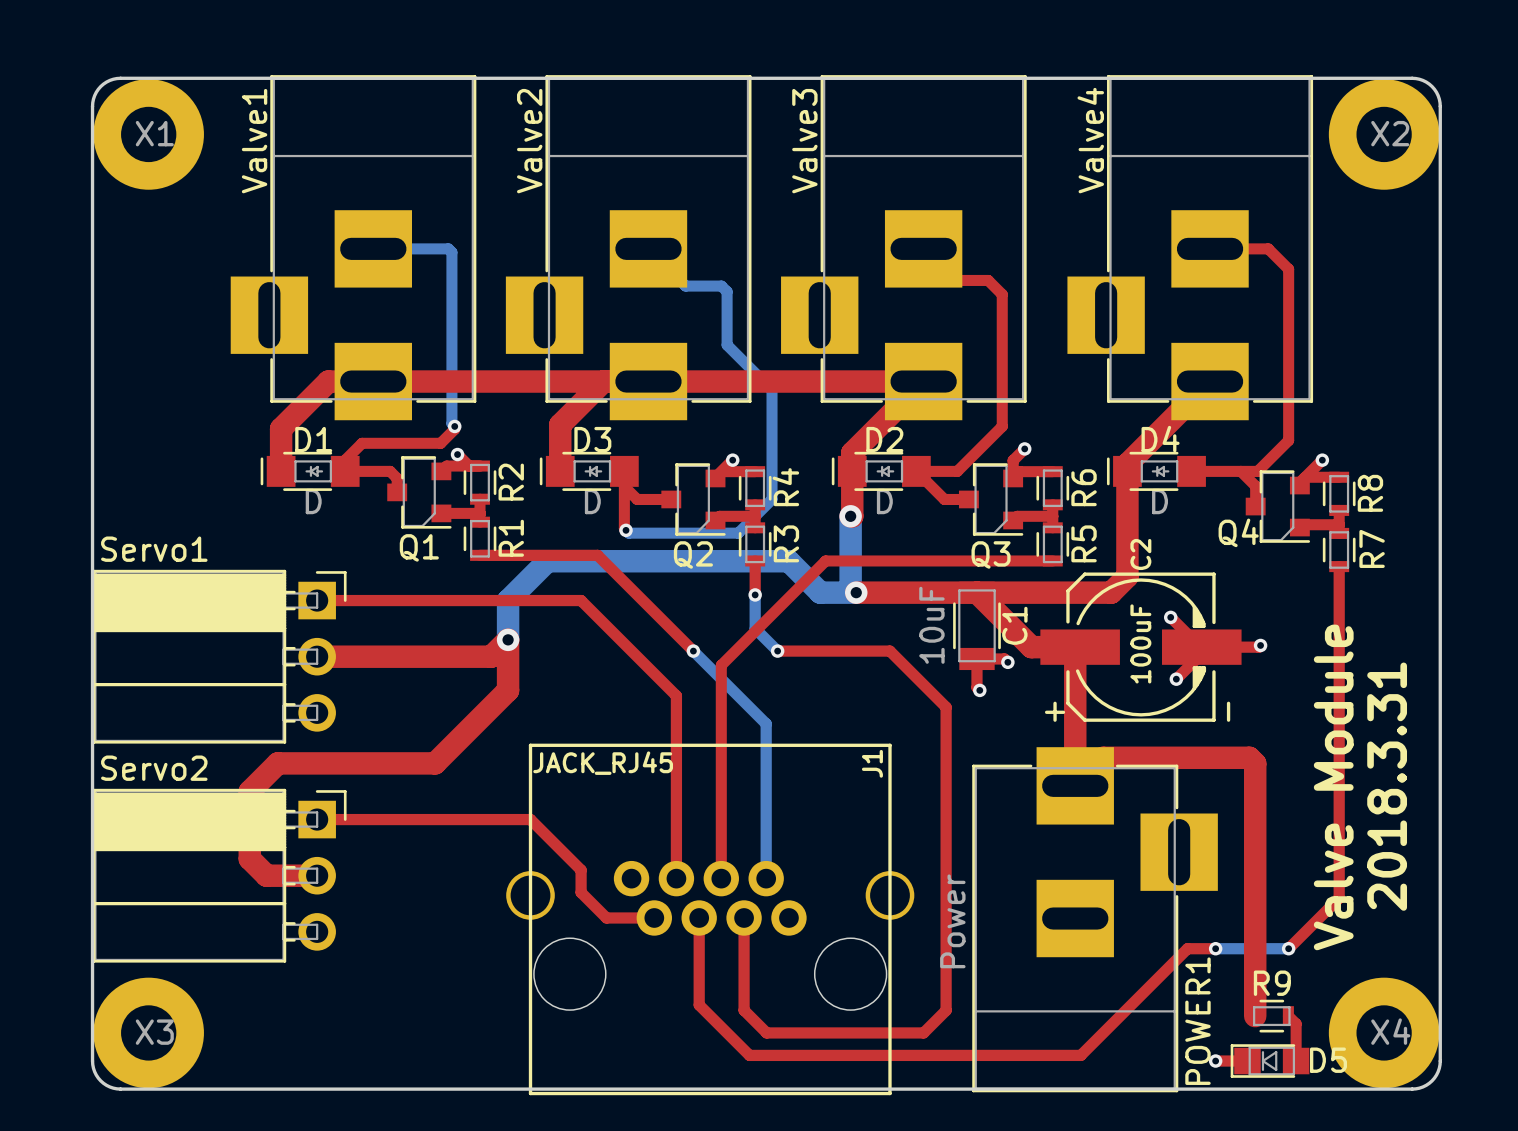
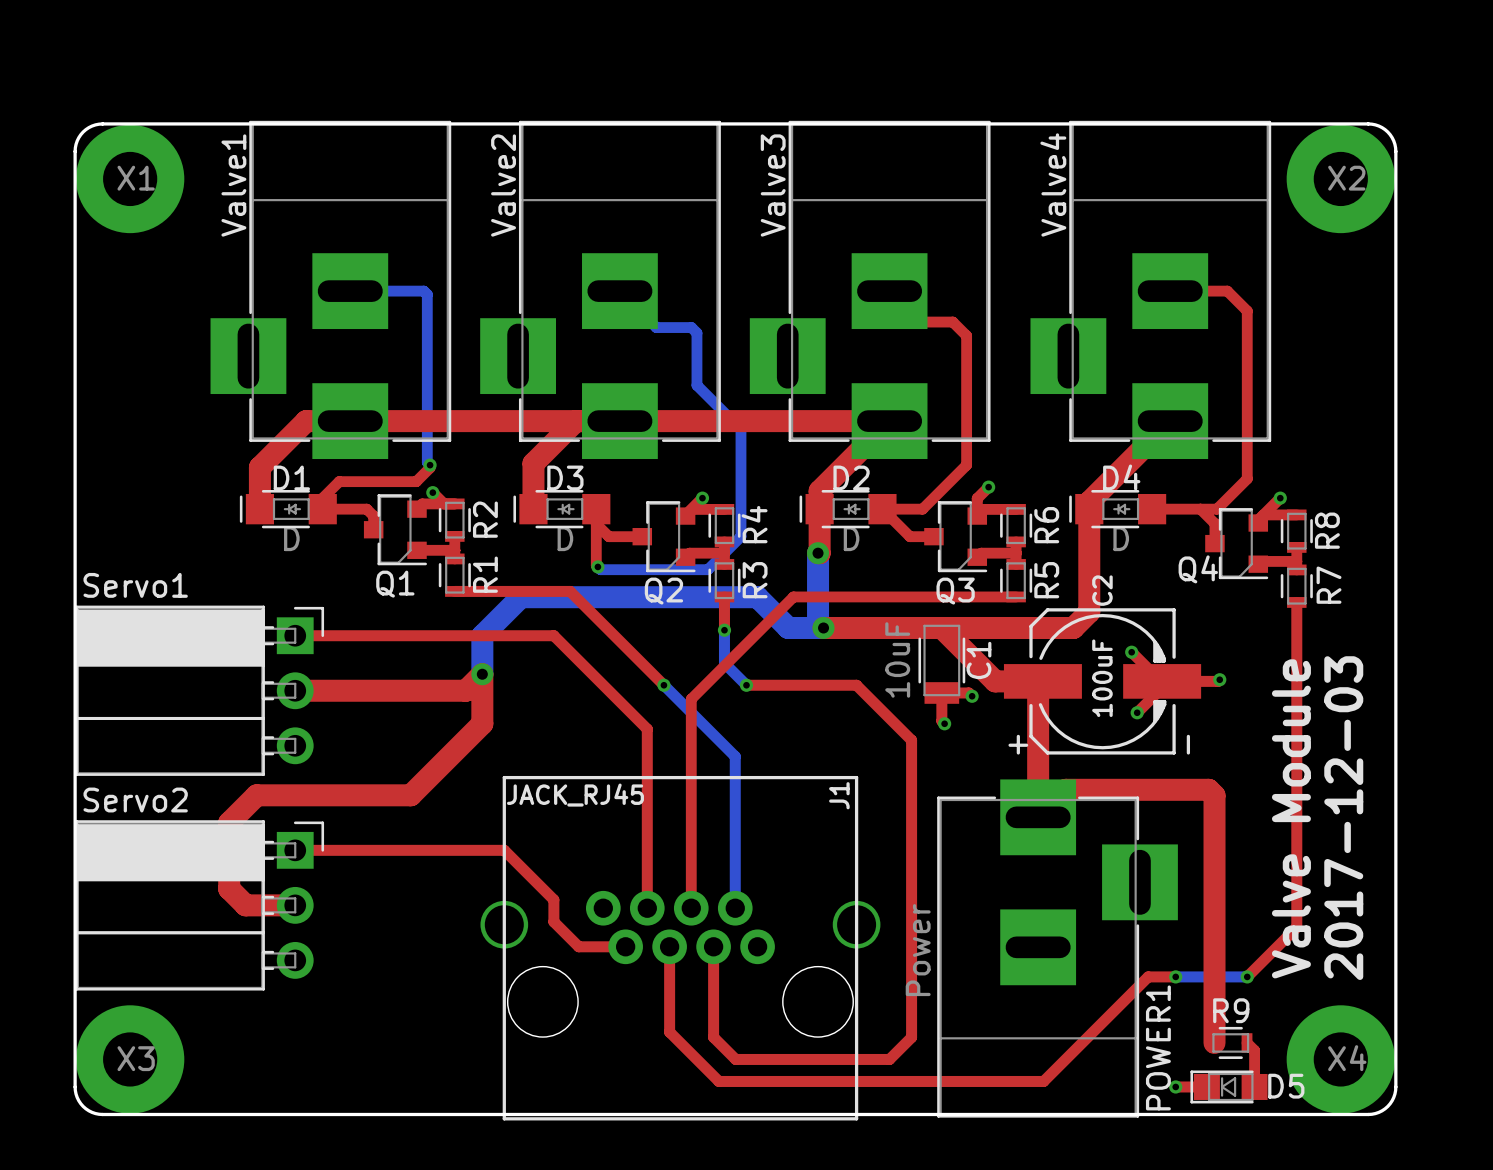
text: 2018.3.31 (1387, 786) -> 2017-12-03 (1343, 818)

